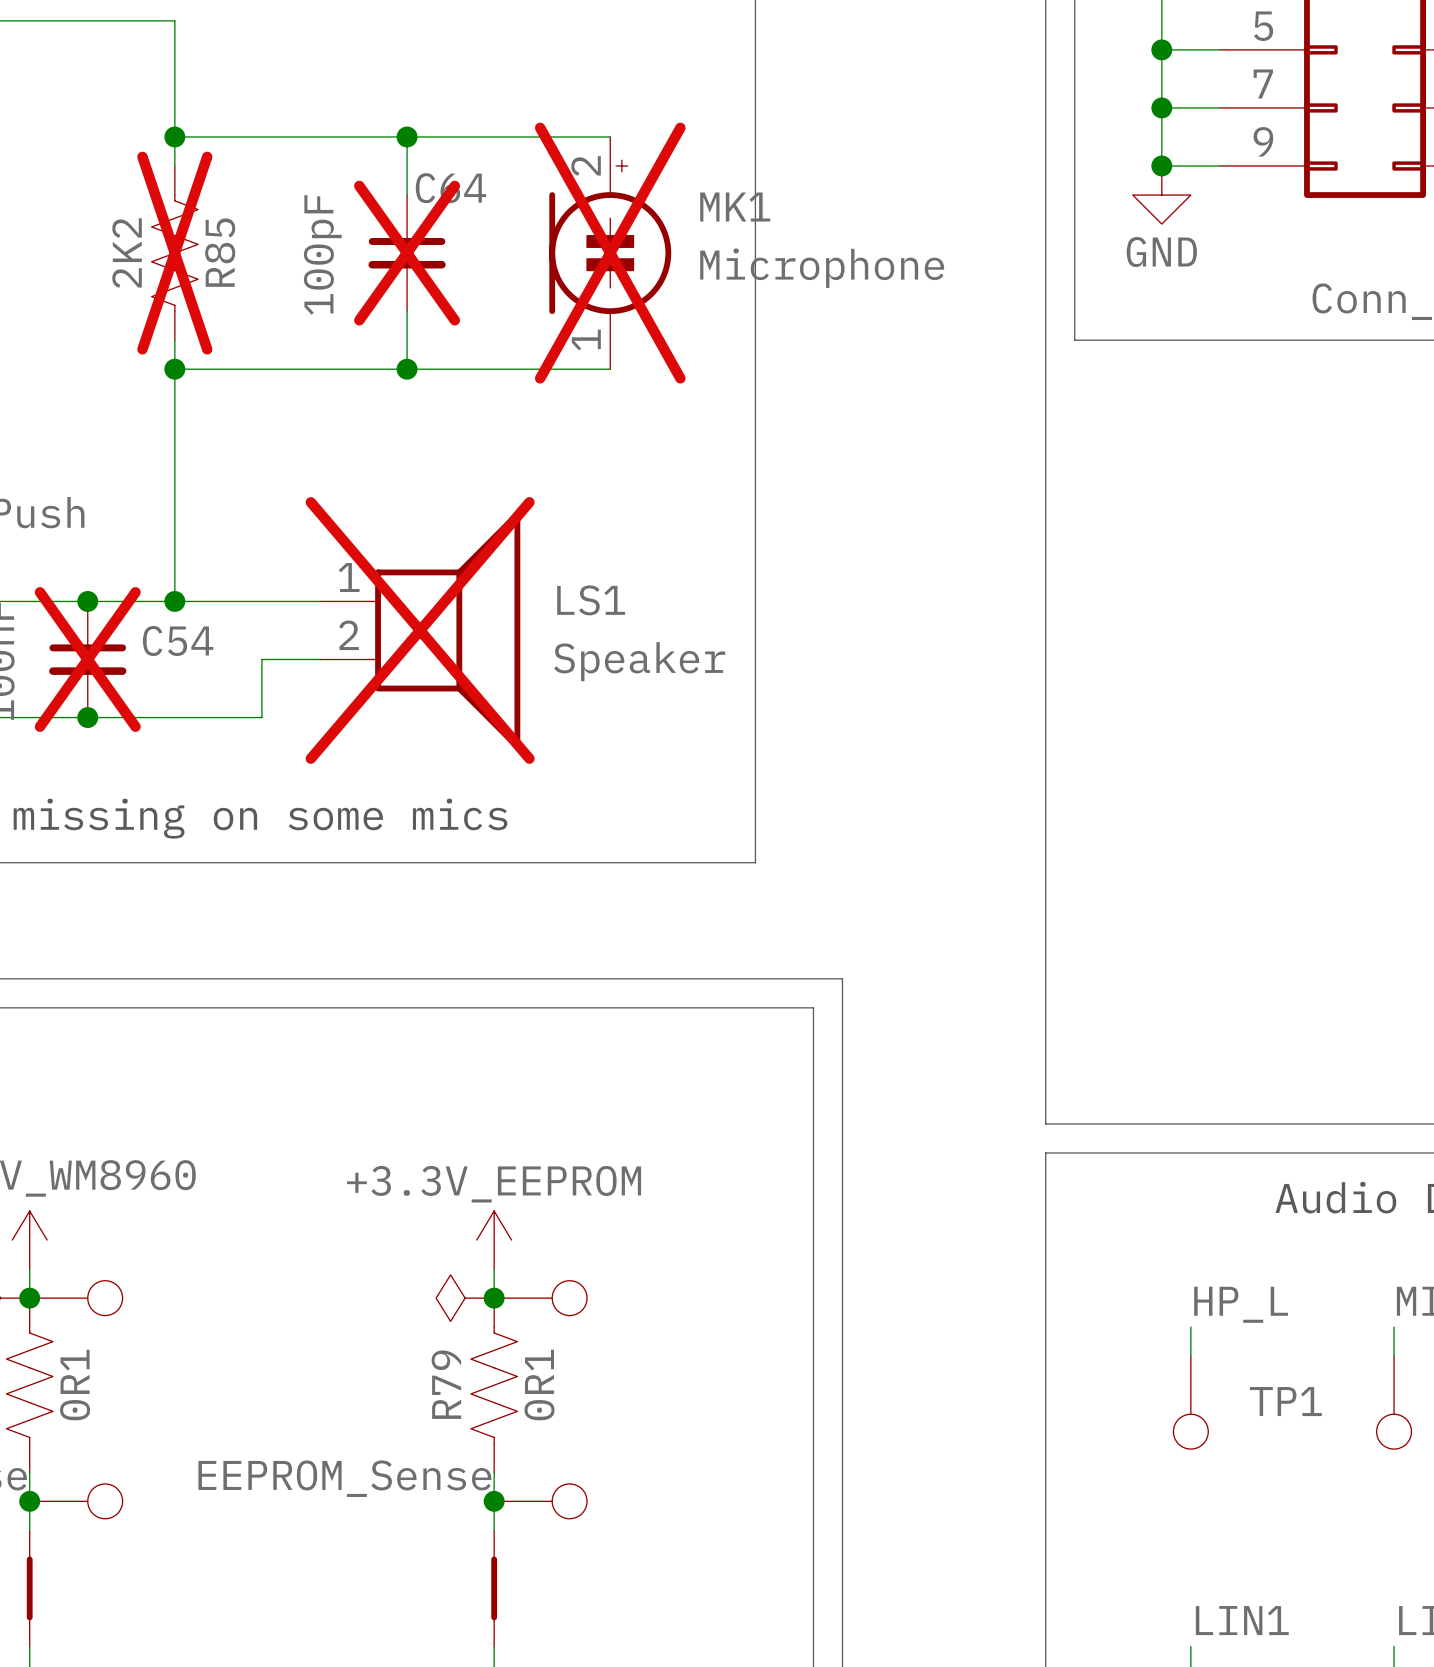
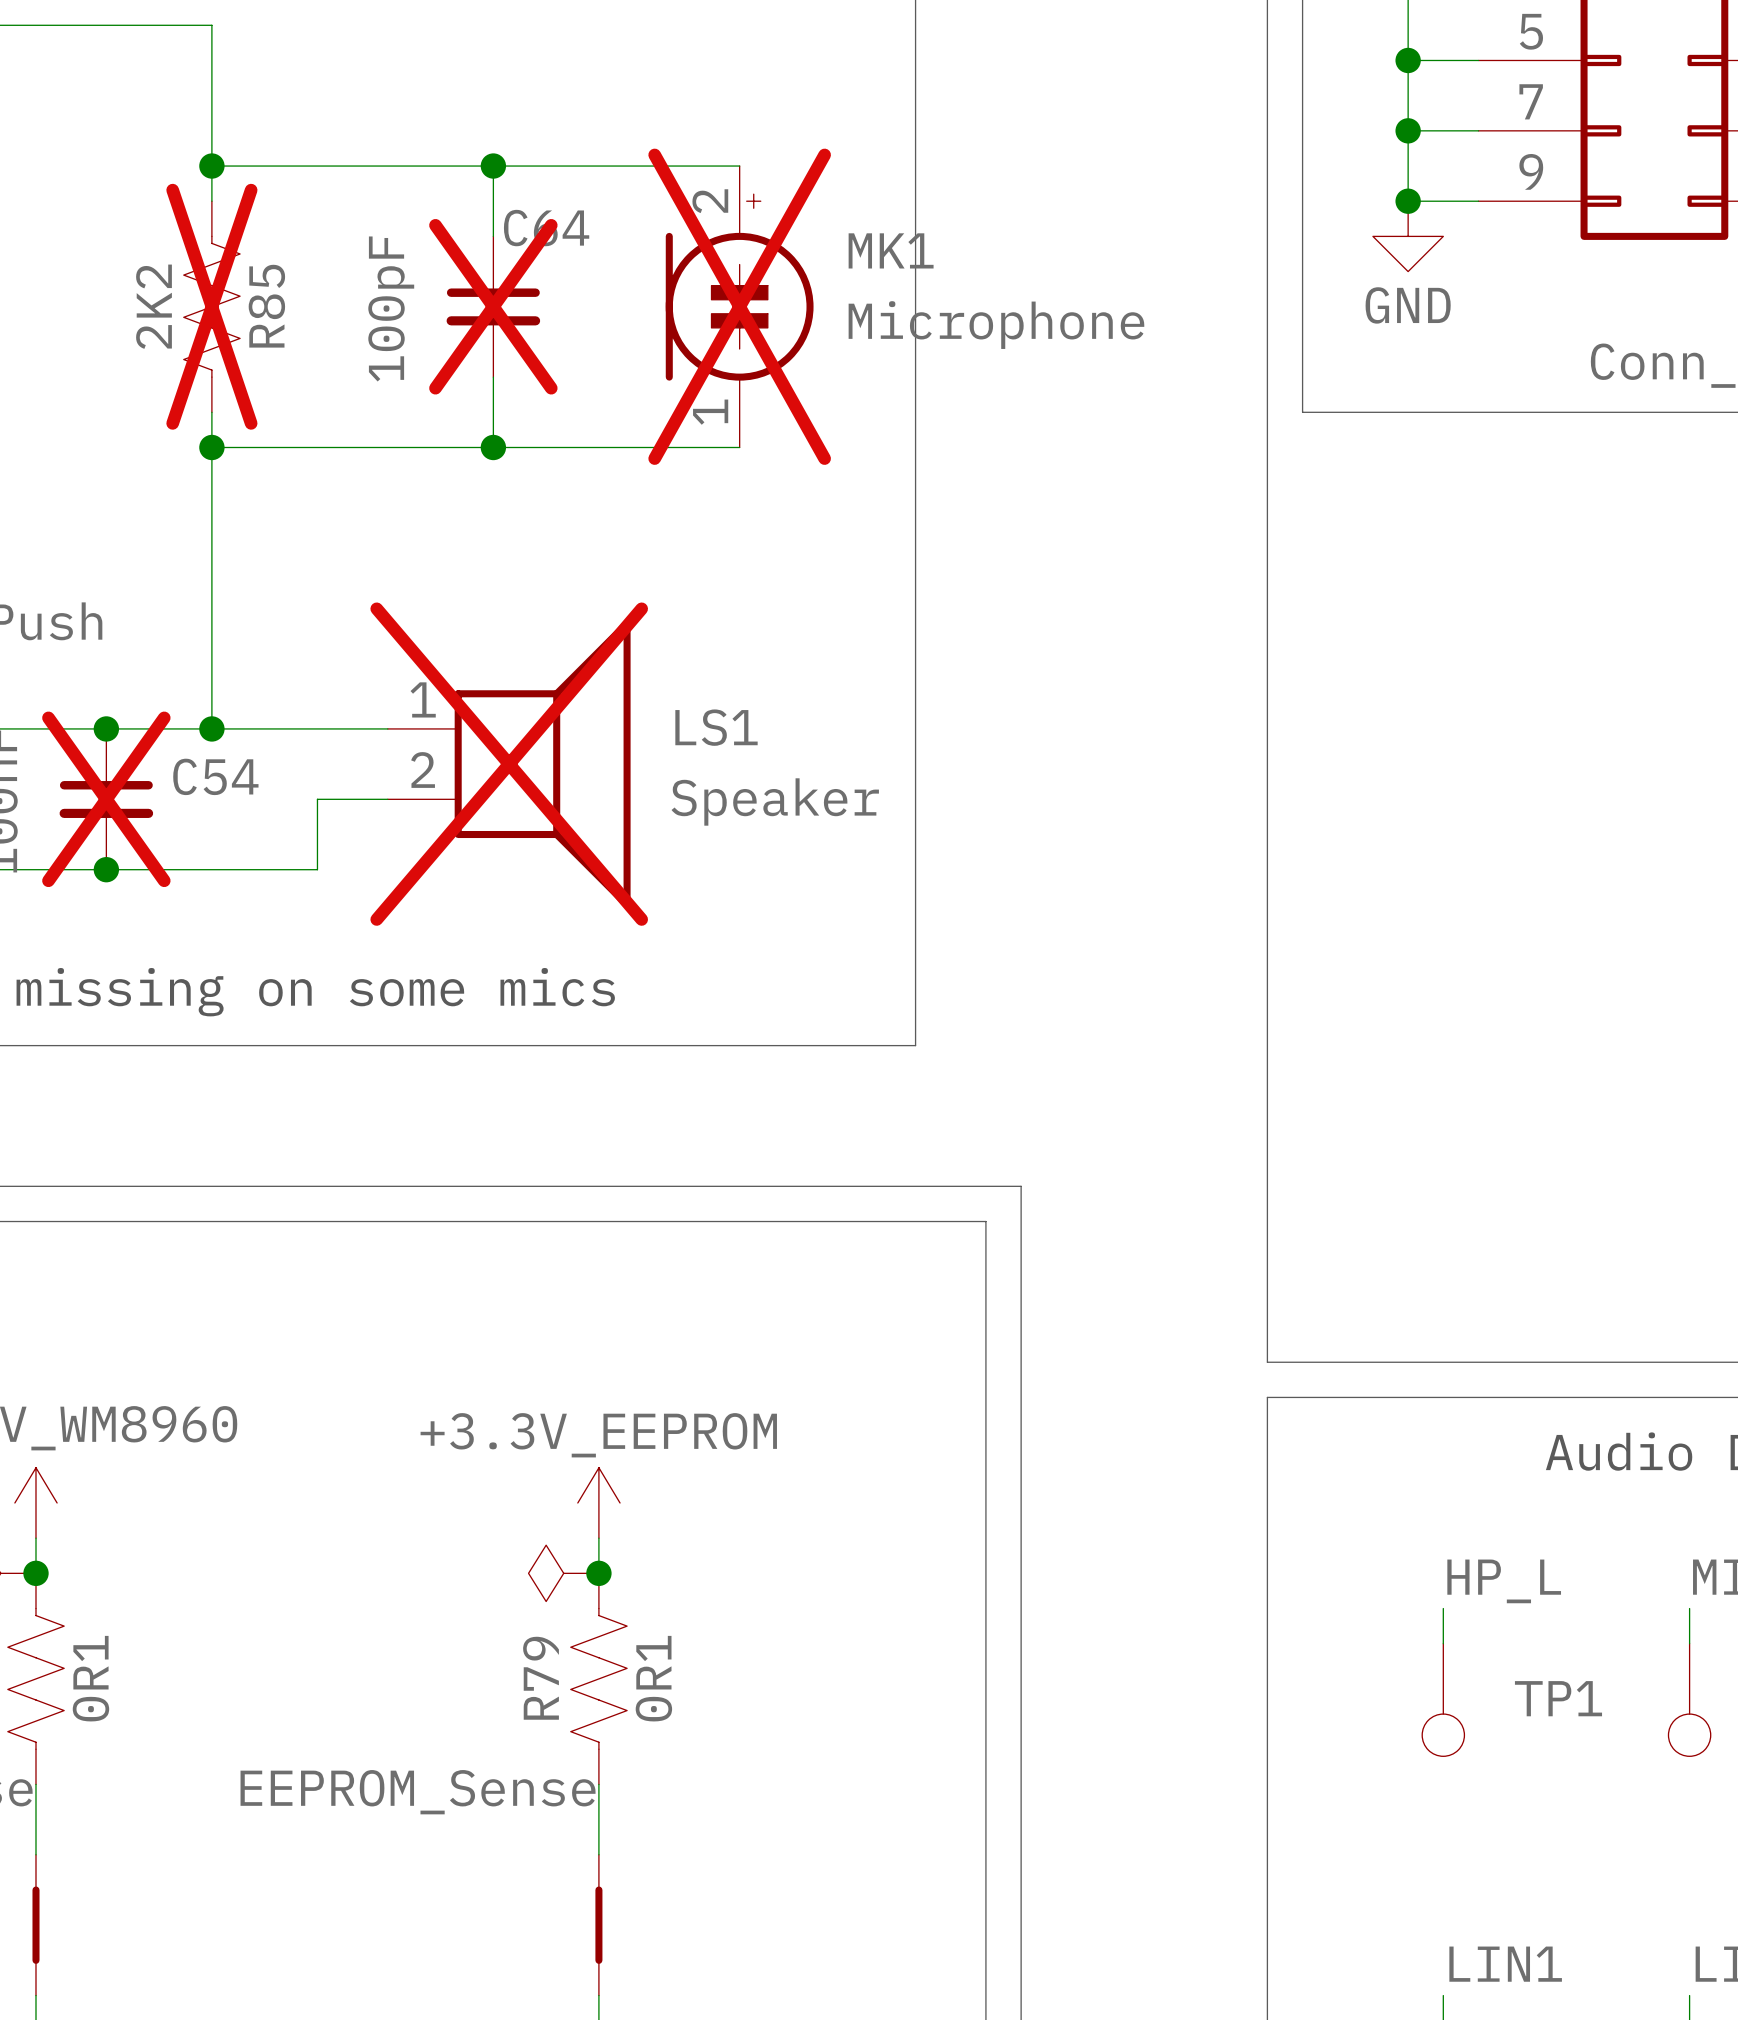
part: (76, 1298) -> none
part: (540, 1298) -> none
junction: (29, 1501) -> none
part: (76, 1501) -> none
junction: (494, 1501) -> none
part: (540, 1501) -> none

